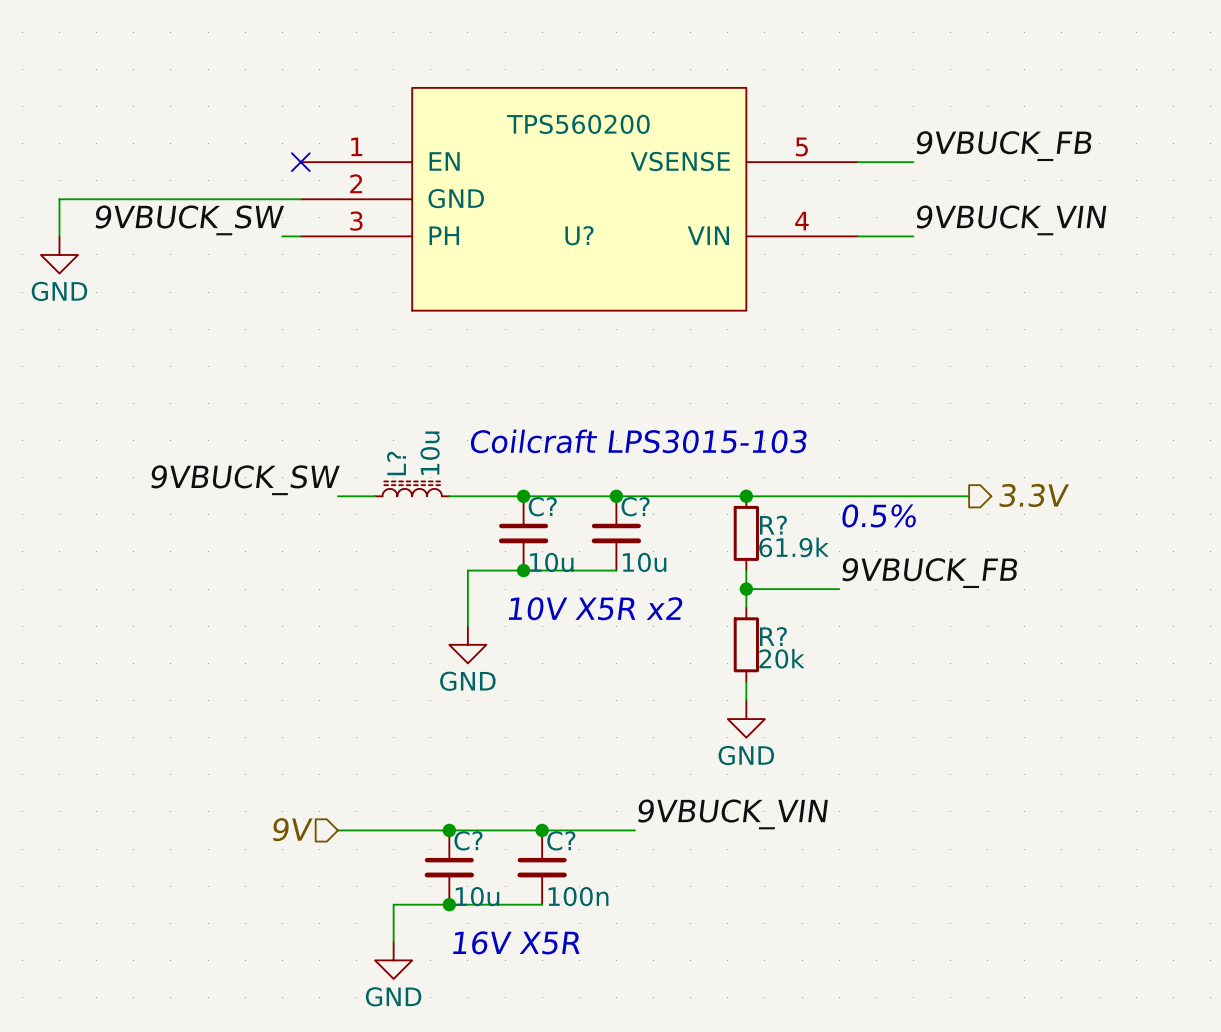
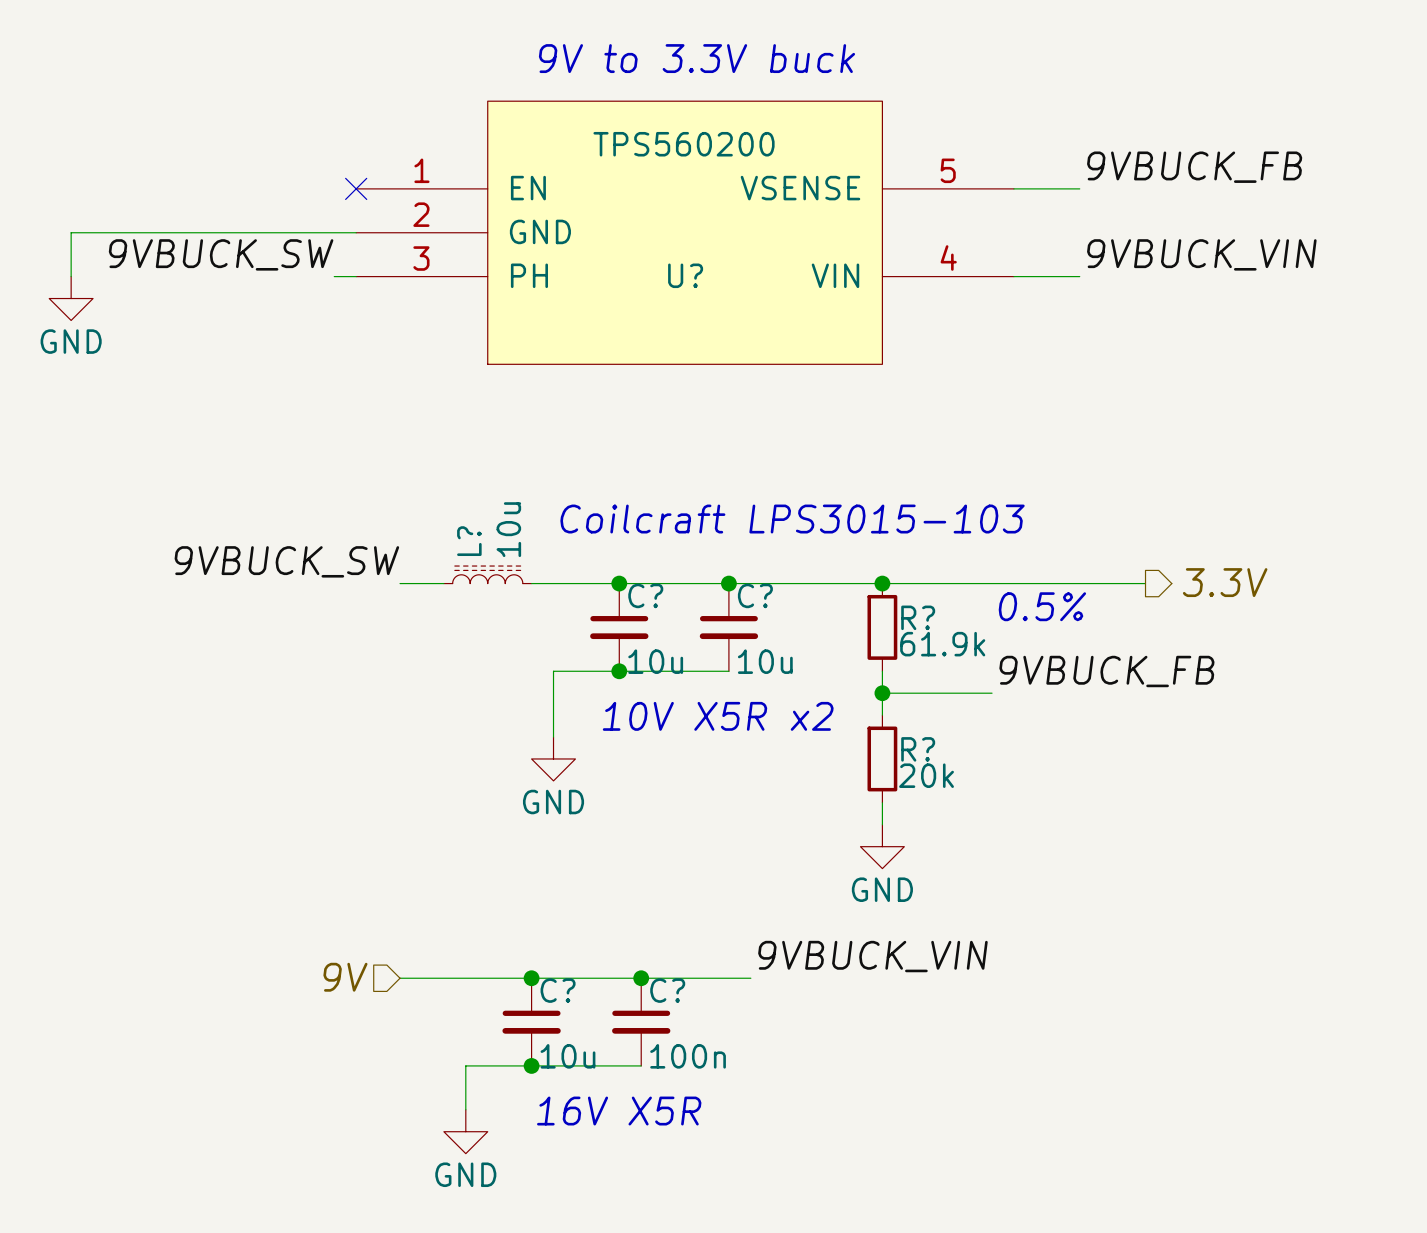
text: none -> 9V to 3.3V buck (696, 58)

